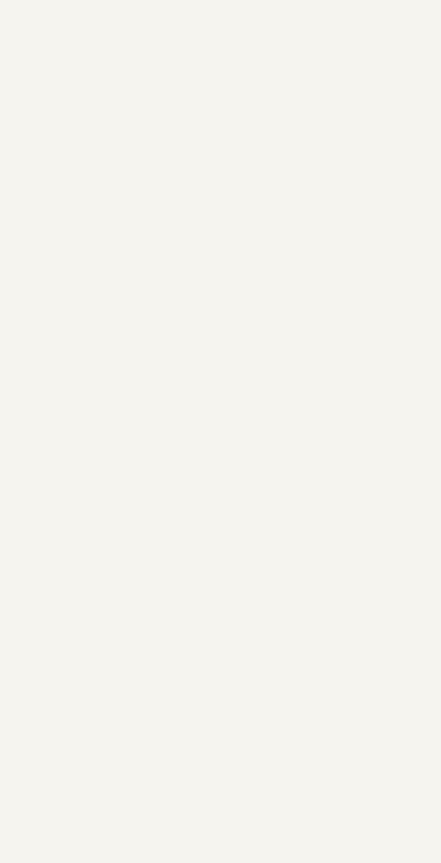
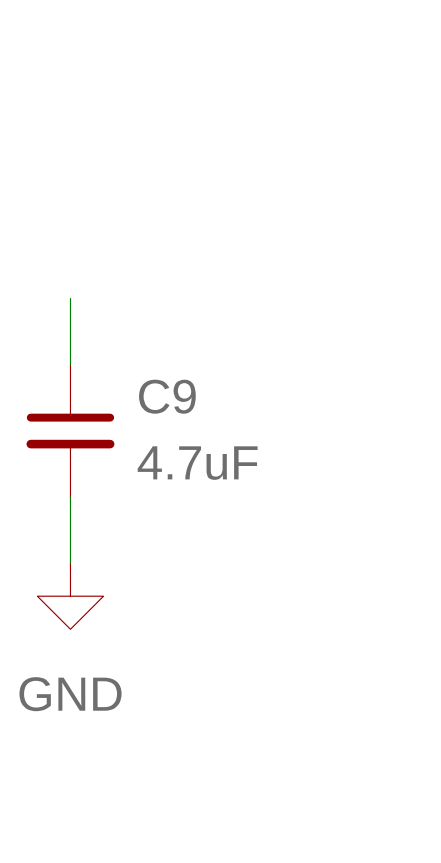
wire: none -> (70, 298) (70, 364)
C9: none -> 4.7uF (70, 430)
wire: none -> (70, 497) (70, 563)
power symbol: none -> GND (70, 596)

